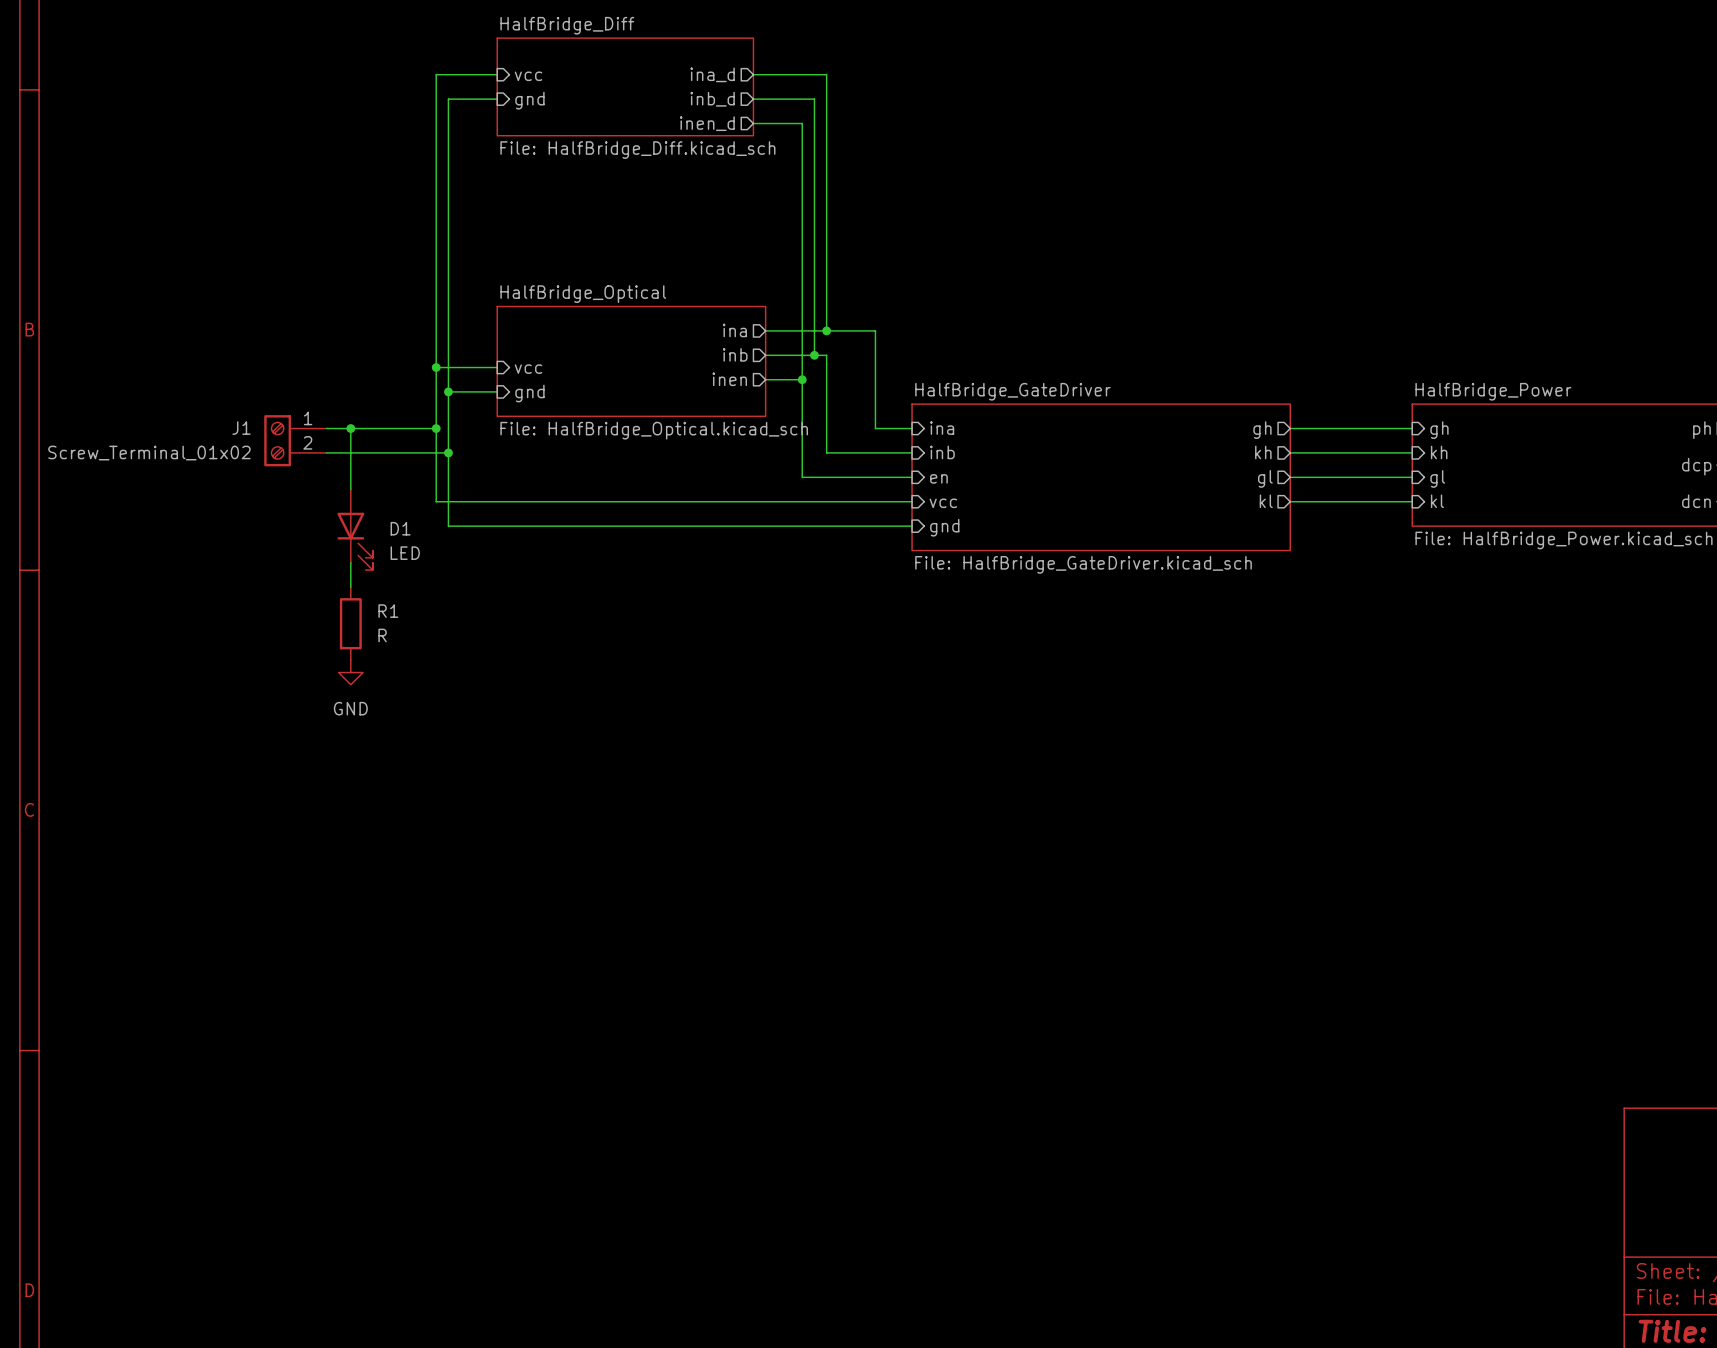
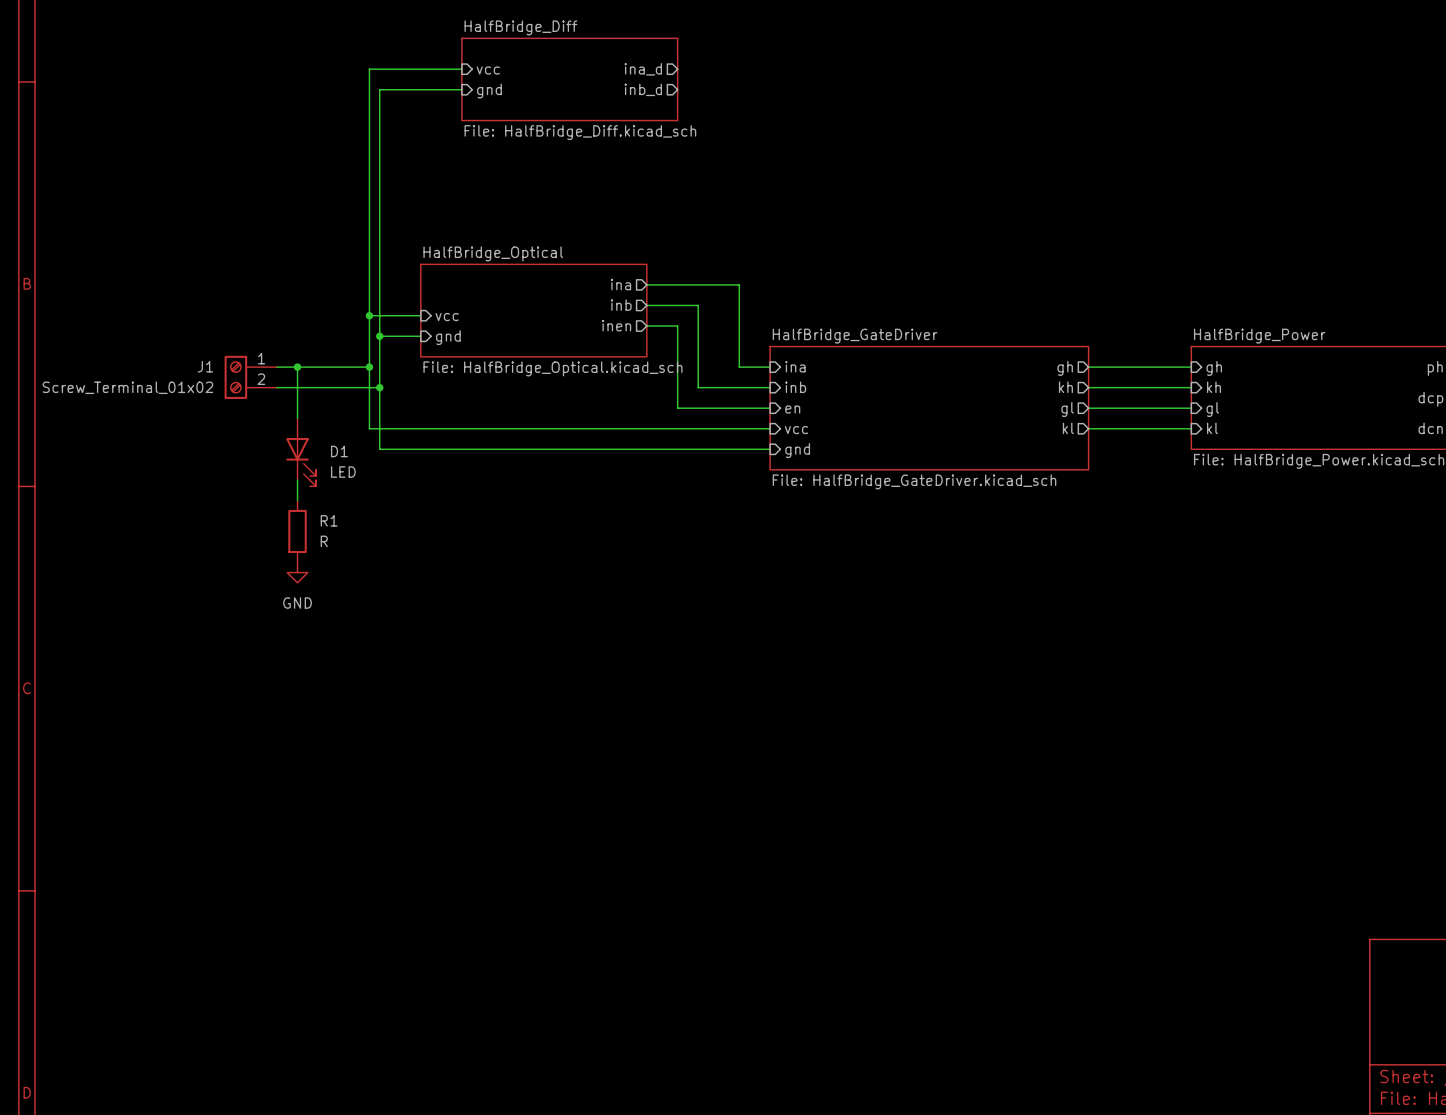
wire: none -> (420, 69) (461, 69)
sheet pin position: ina_d (712, 74) -> ina_d (643, 69)
wire: (753, 74) (826, 74) (826, 330) -> none
sheet pin position: vcc (528, 76) -> vcc (488, 70)
sheet HalfBridge_Diff position: (625, 86) -> (569, 79)
wire: none -> (420, 89) (461, 89)
sheet pin position: inb_d (712, 99) -> inb_d (643, 89)
wire: (753, 99) (814, 99) (814, 355) -> none
sheet pin position: gnd (529, 100) -> gnd (489, 91)
sheet pin: inen_d (707, 123) -> none
wire: (753, 123) (802, 123) (802, 379) -> none
junction: (826, 330) -> none
junction: (814, 355) -> none
junction: (802, 379) -> none

